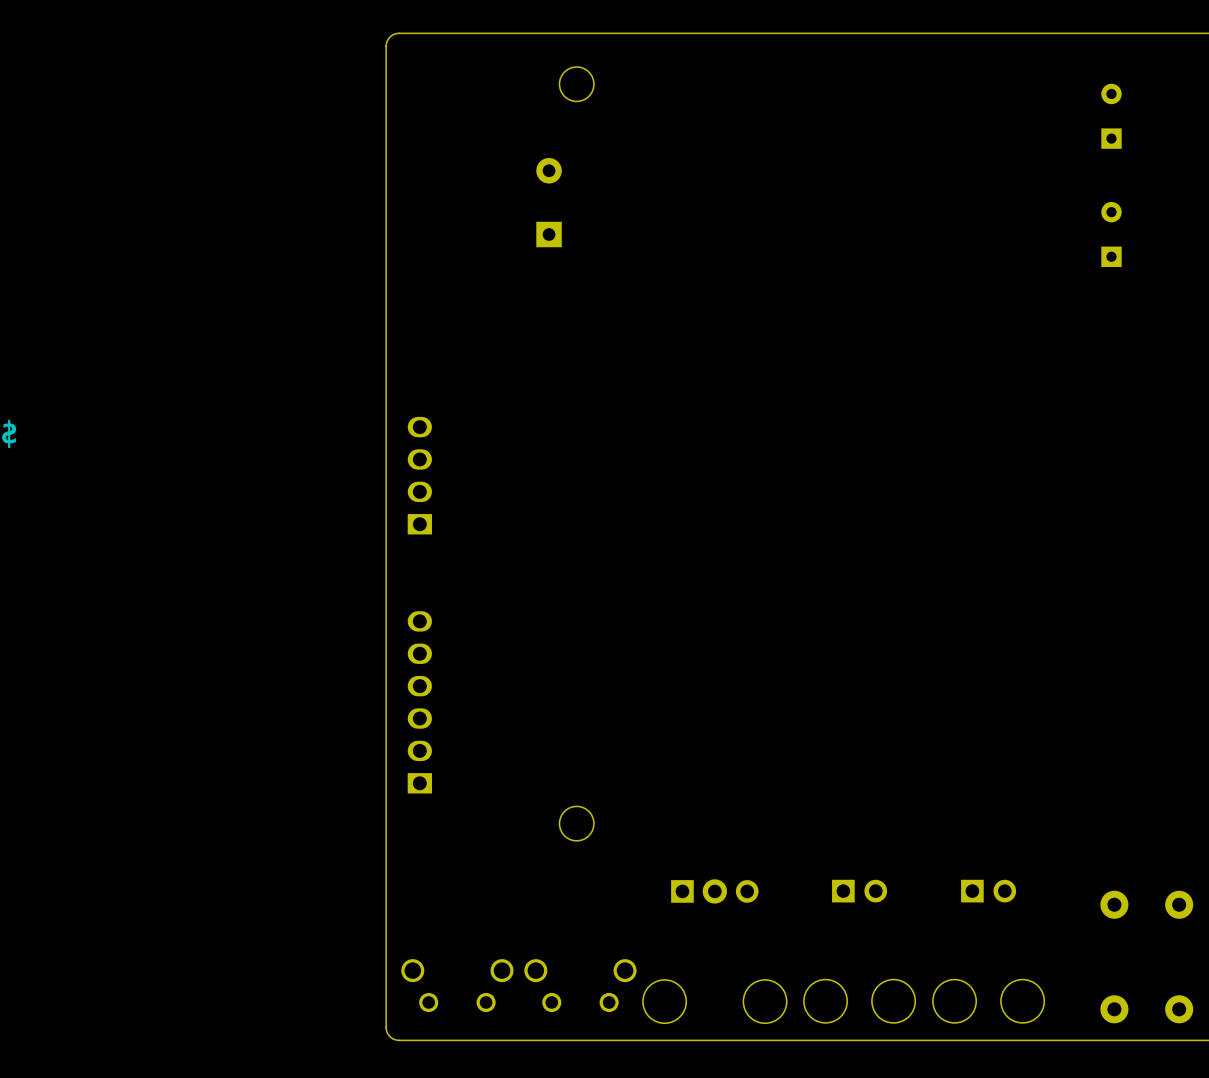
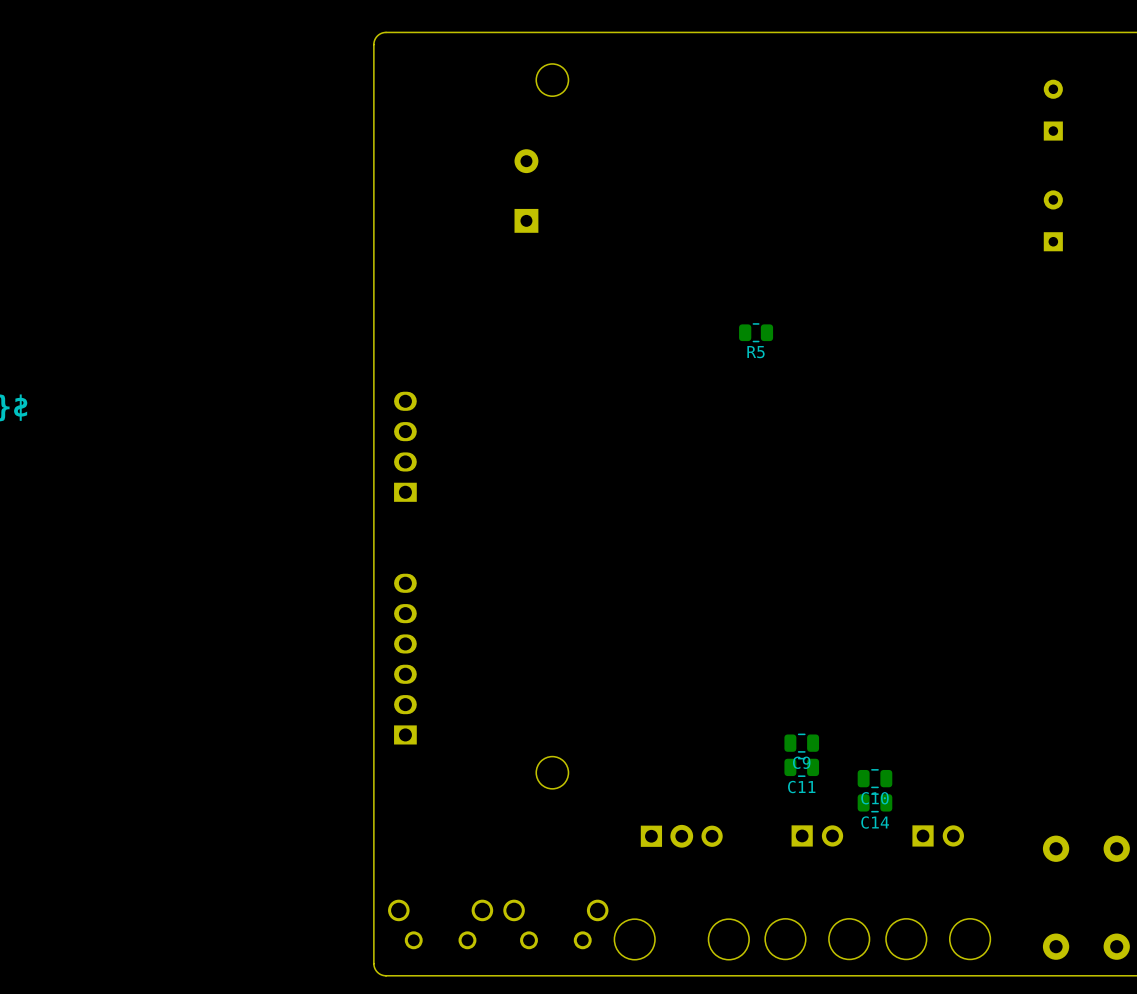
R5: none -> (756, 332)
C9: none -> (801, 743)
C11: none -> (801, 767)
C10: none -> (874, 778)
C14: none -> (874, 802)

